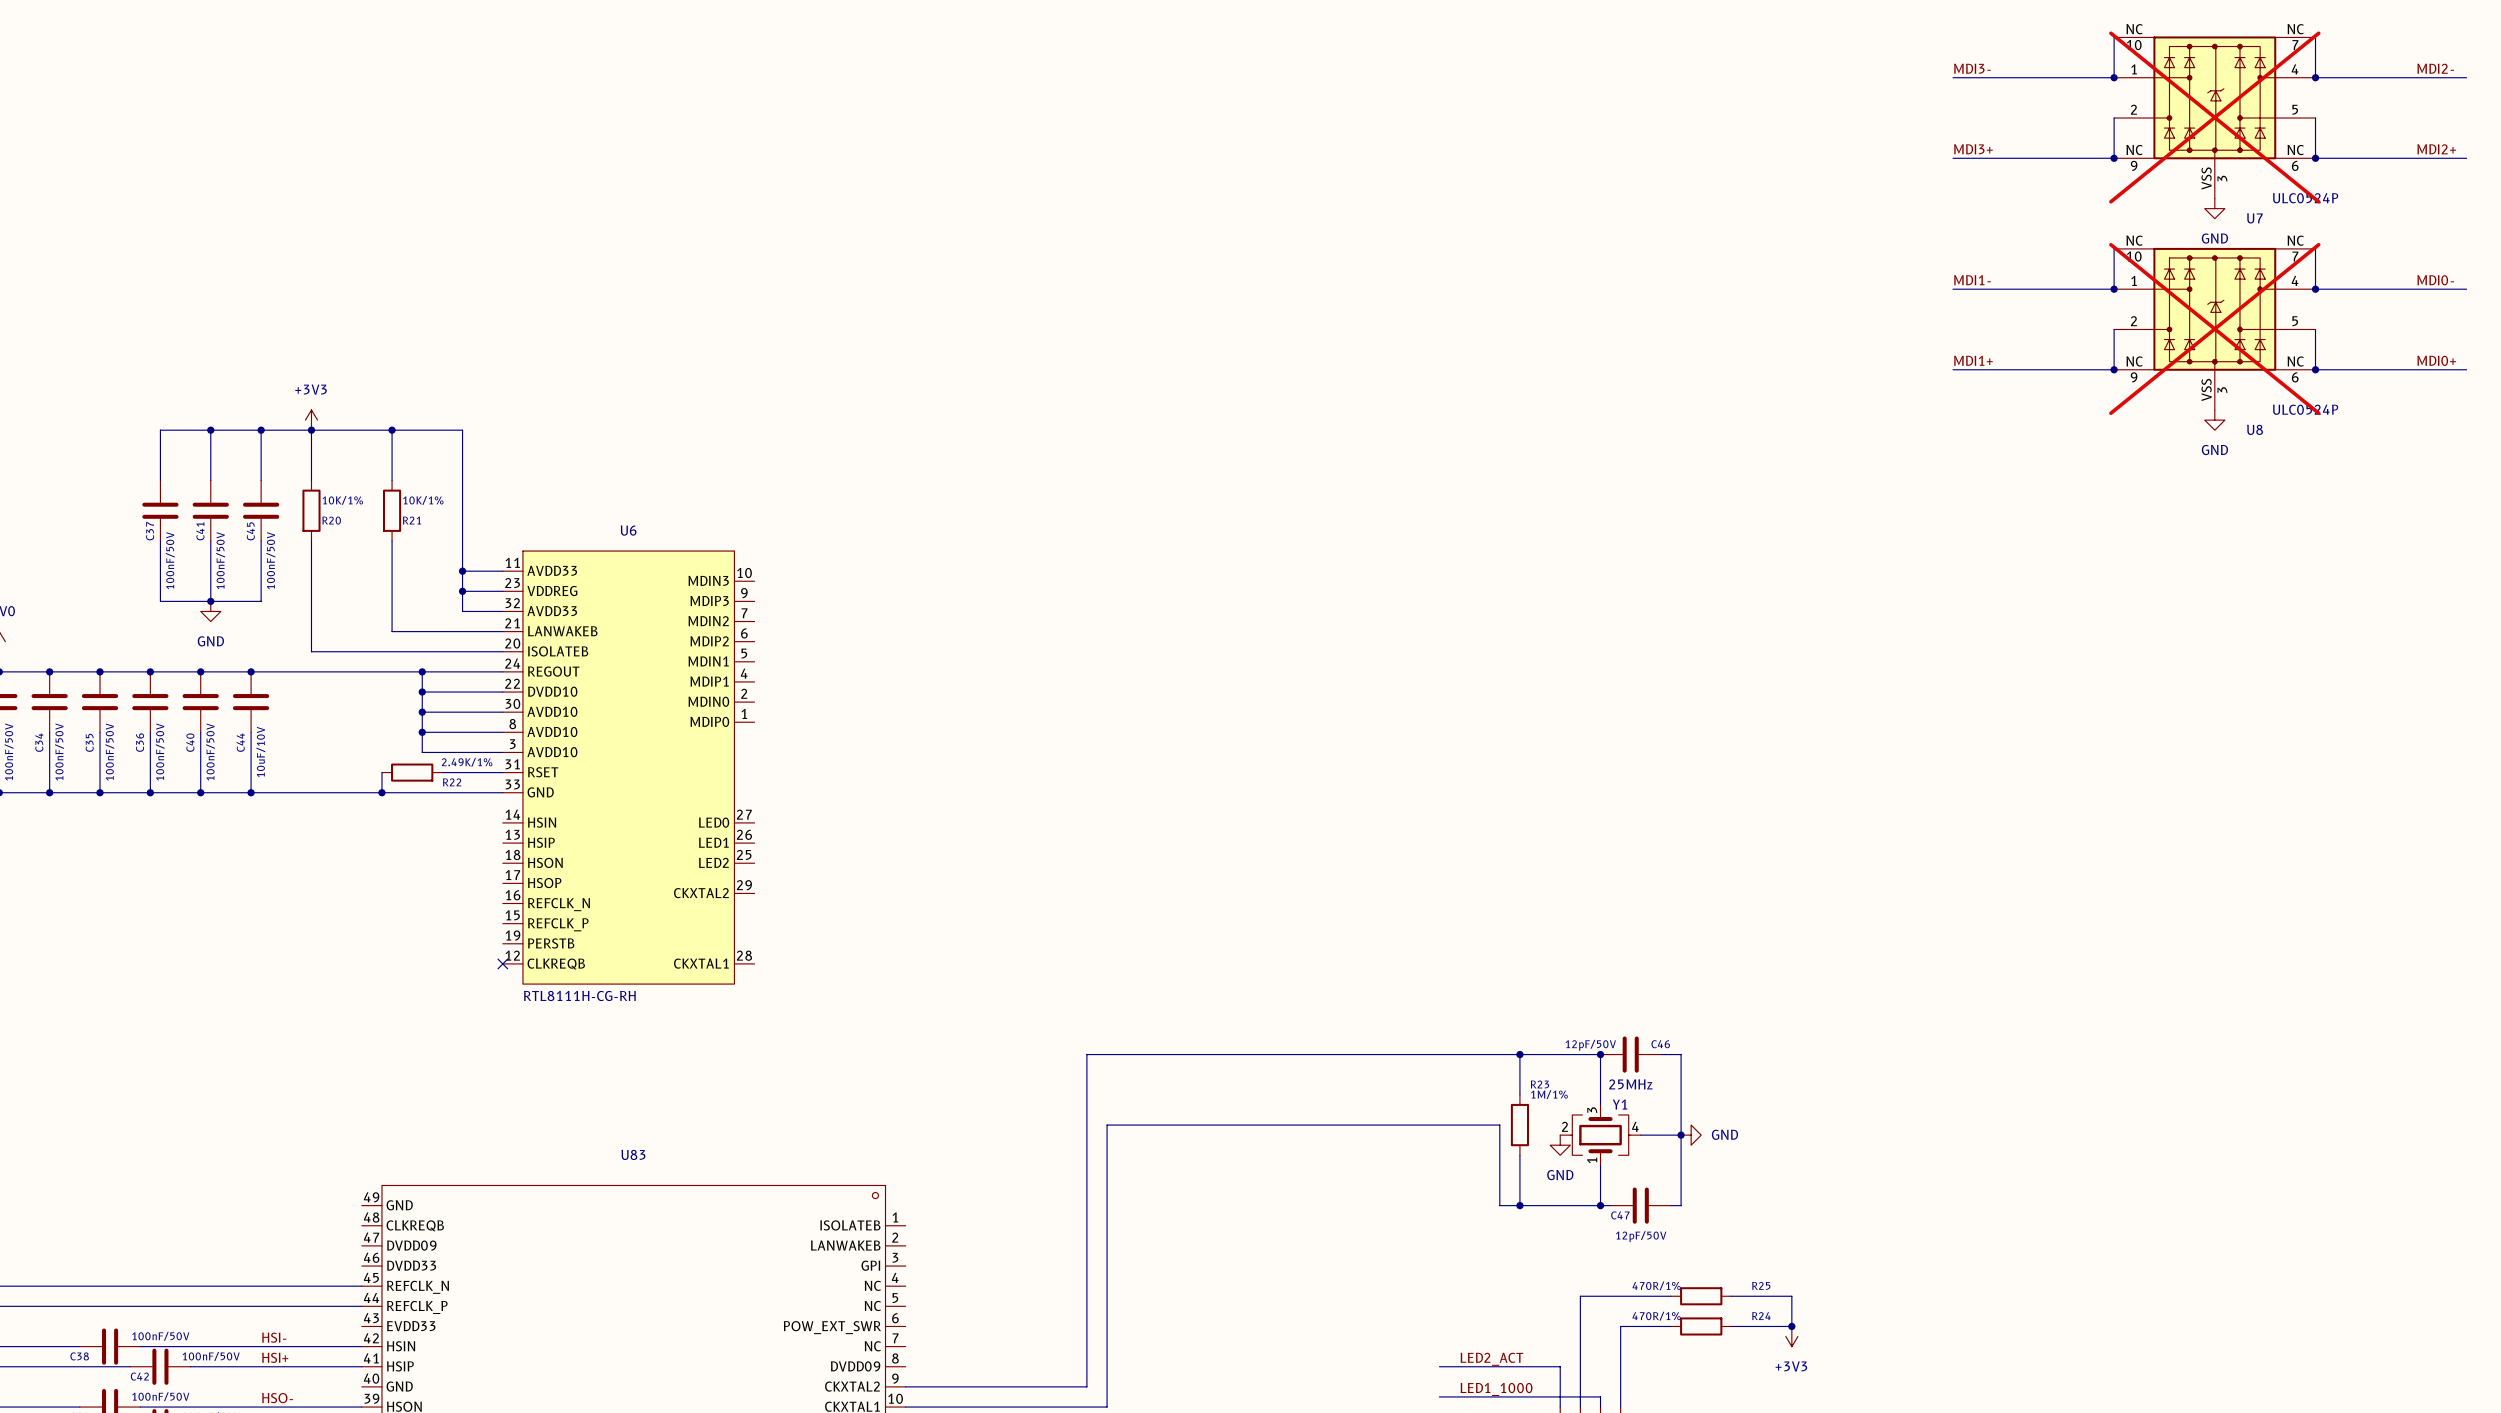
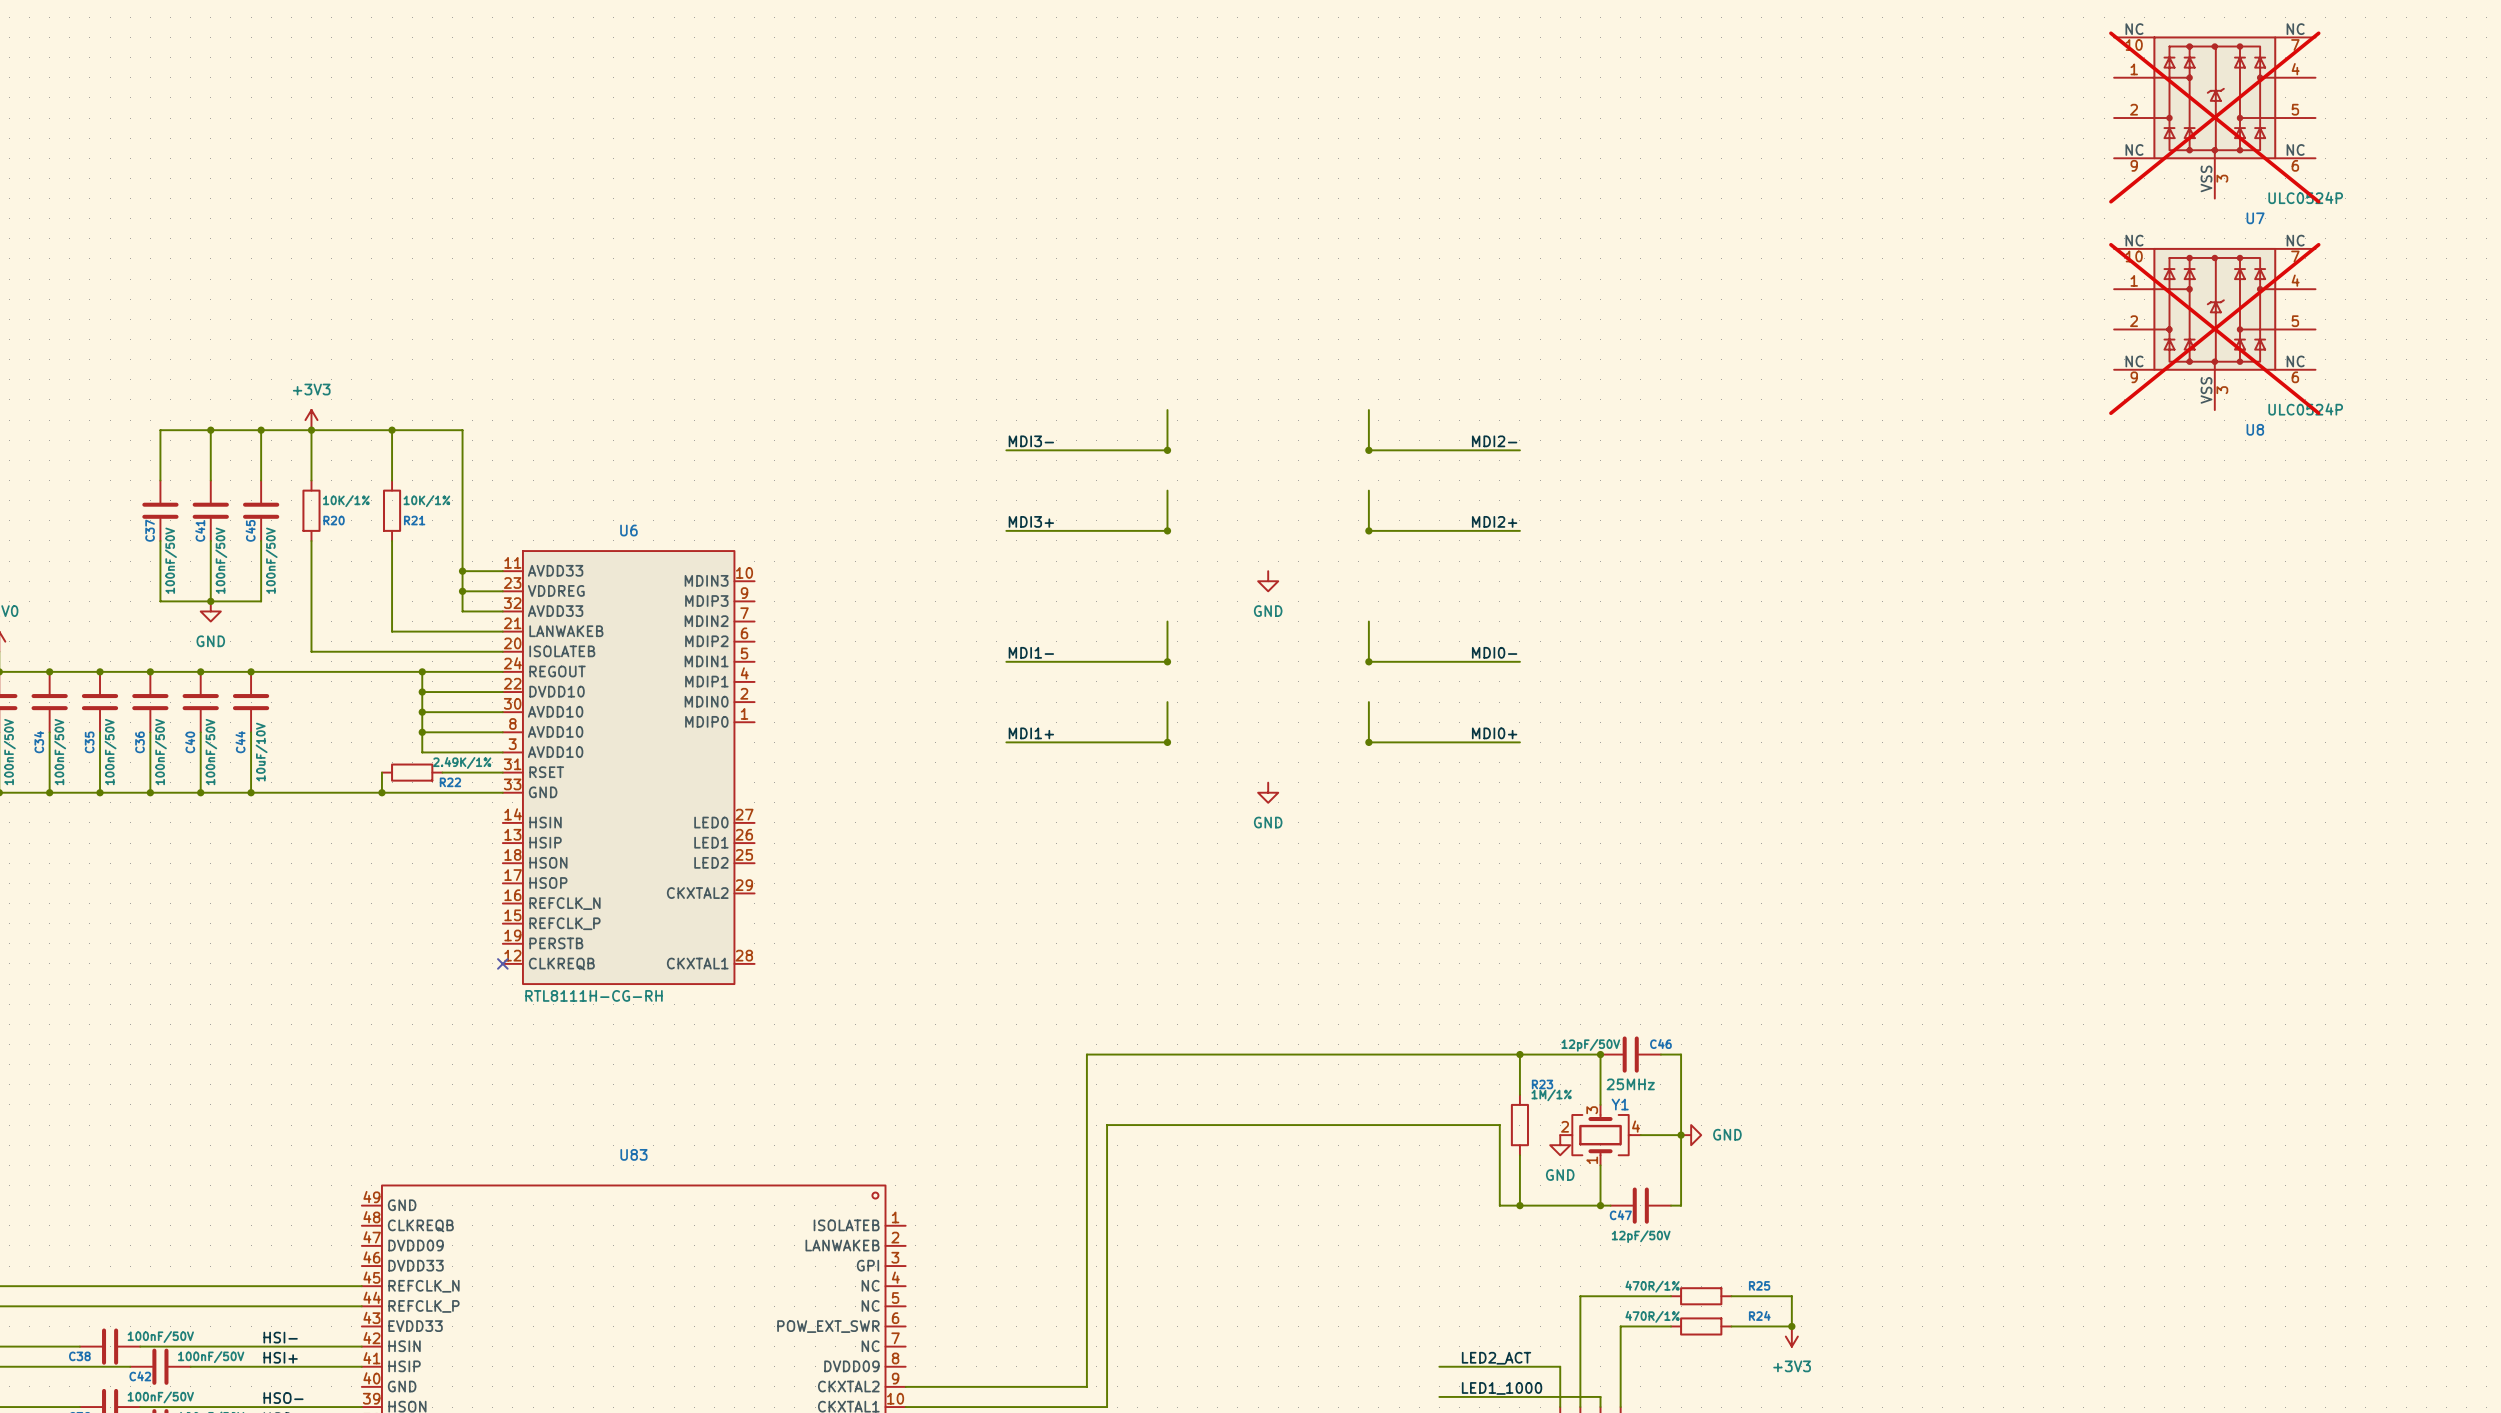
wire: (2114, 37) (2114, 77) (1952, 77) -> none
wire: (2315, 37) (2315, 77) (2466, 77) -> none
label: MDI3- (1972, 68) -> none
label: MDI2- (2435, 68) -> none
junction: (2114, 77) -> none
junction: (2315, 77) -> none
wire: (2114, 118) (2114, 158) (1952, 158) -> none
wire: (2315, 118) (2315, 158) (2466, 158) -> none
label: MDI3+ (1973, 149) -> none
label: MDI2+ (2436, 149) -> none
junction: (2114, 158) -> none
junction: (2315, 158) -> none
power symbol: GND (2214, 208) -> none
wire: (2114, 248) (2114, 289) (1952, 289) -> none
wire: (2315, 248) (2315, 289) (2466, 289) -> none
label: MDI1- (1972, 280) -> none
label: MDI0- (2435, 280) -> none
junction: (2114, 289) -> none
junction: (2315, 289) -> none
wire: (2114, 329) (2114, 369) (1952, 369) -> none
wire: (2315, 329) (2315, 369) (2466, 369) -> none
label: MDI1+ (1973, 360) -> none
label: MDI0+ (2436, 360) -> none
junction: (2114, 369) -> none
junction: (2315, 369) -> none
wire: none -> (1167, 410) (1167, 450) (1006, 450)
wire: none -> (1368, 410) (1368, 450) (1519, 450)
power symbol: GND (2214, 420) -> none
label: none -> MDI3- (1031, 441)
label: none -> MDI2- (1494, 441)
junction: none -> (1167, 450)
junction: none -> (1368, 450)
wire: none -> (1167, 490) (1167, 530) (1006, 530)
wire: none -> (1368, 490) (1368, 530) (1519, 530)
label: none -> MDI3+ (1031, 521)
label: none -> MDI2+ (1494, 521)
junction: none -> (1167, 530)
junction: none -> (1368, 530)
power symbol: none -> GND (1268, 581)
wire: none -> (1167, 621) (1167, 661) (1006, 661)
wire: none -> (1368, 621) (1368, 661) (1519, 661)
label: none -> MDI1- (1031, 652)
label: none -> MDI0- (1494, 652)
junction: none -> (1167, 661)
junction: none -> (1368, 661)
wire: none -> (1167, 702) (1167, 742) (1006, 742)
wire: none -> (1368, 702) (1368, 742) (1519, 742)
label: none -> MDI1+ (1031, 733)
label: none -> MDI0+ (1494, 733)
junction: none -> (1167, 742)
junction: none -> (1368, 742)
power symbol: none -> GND (1268, 792)

